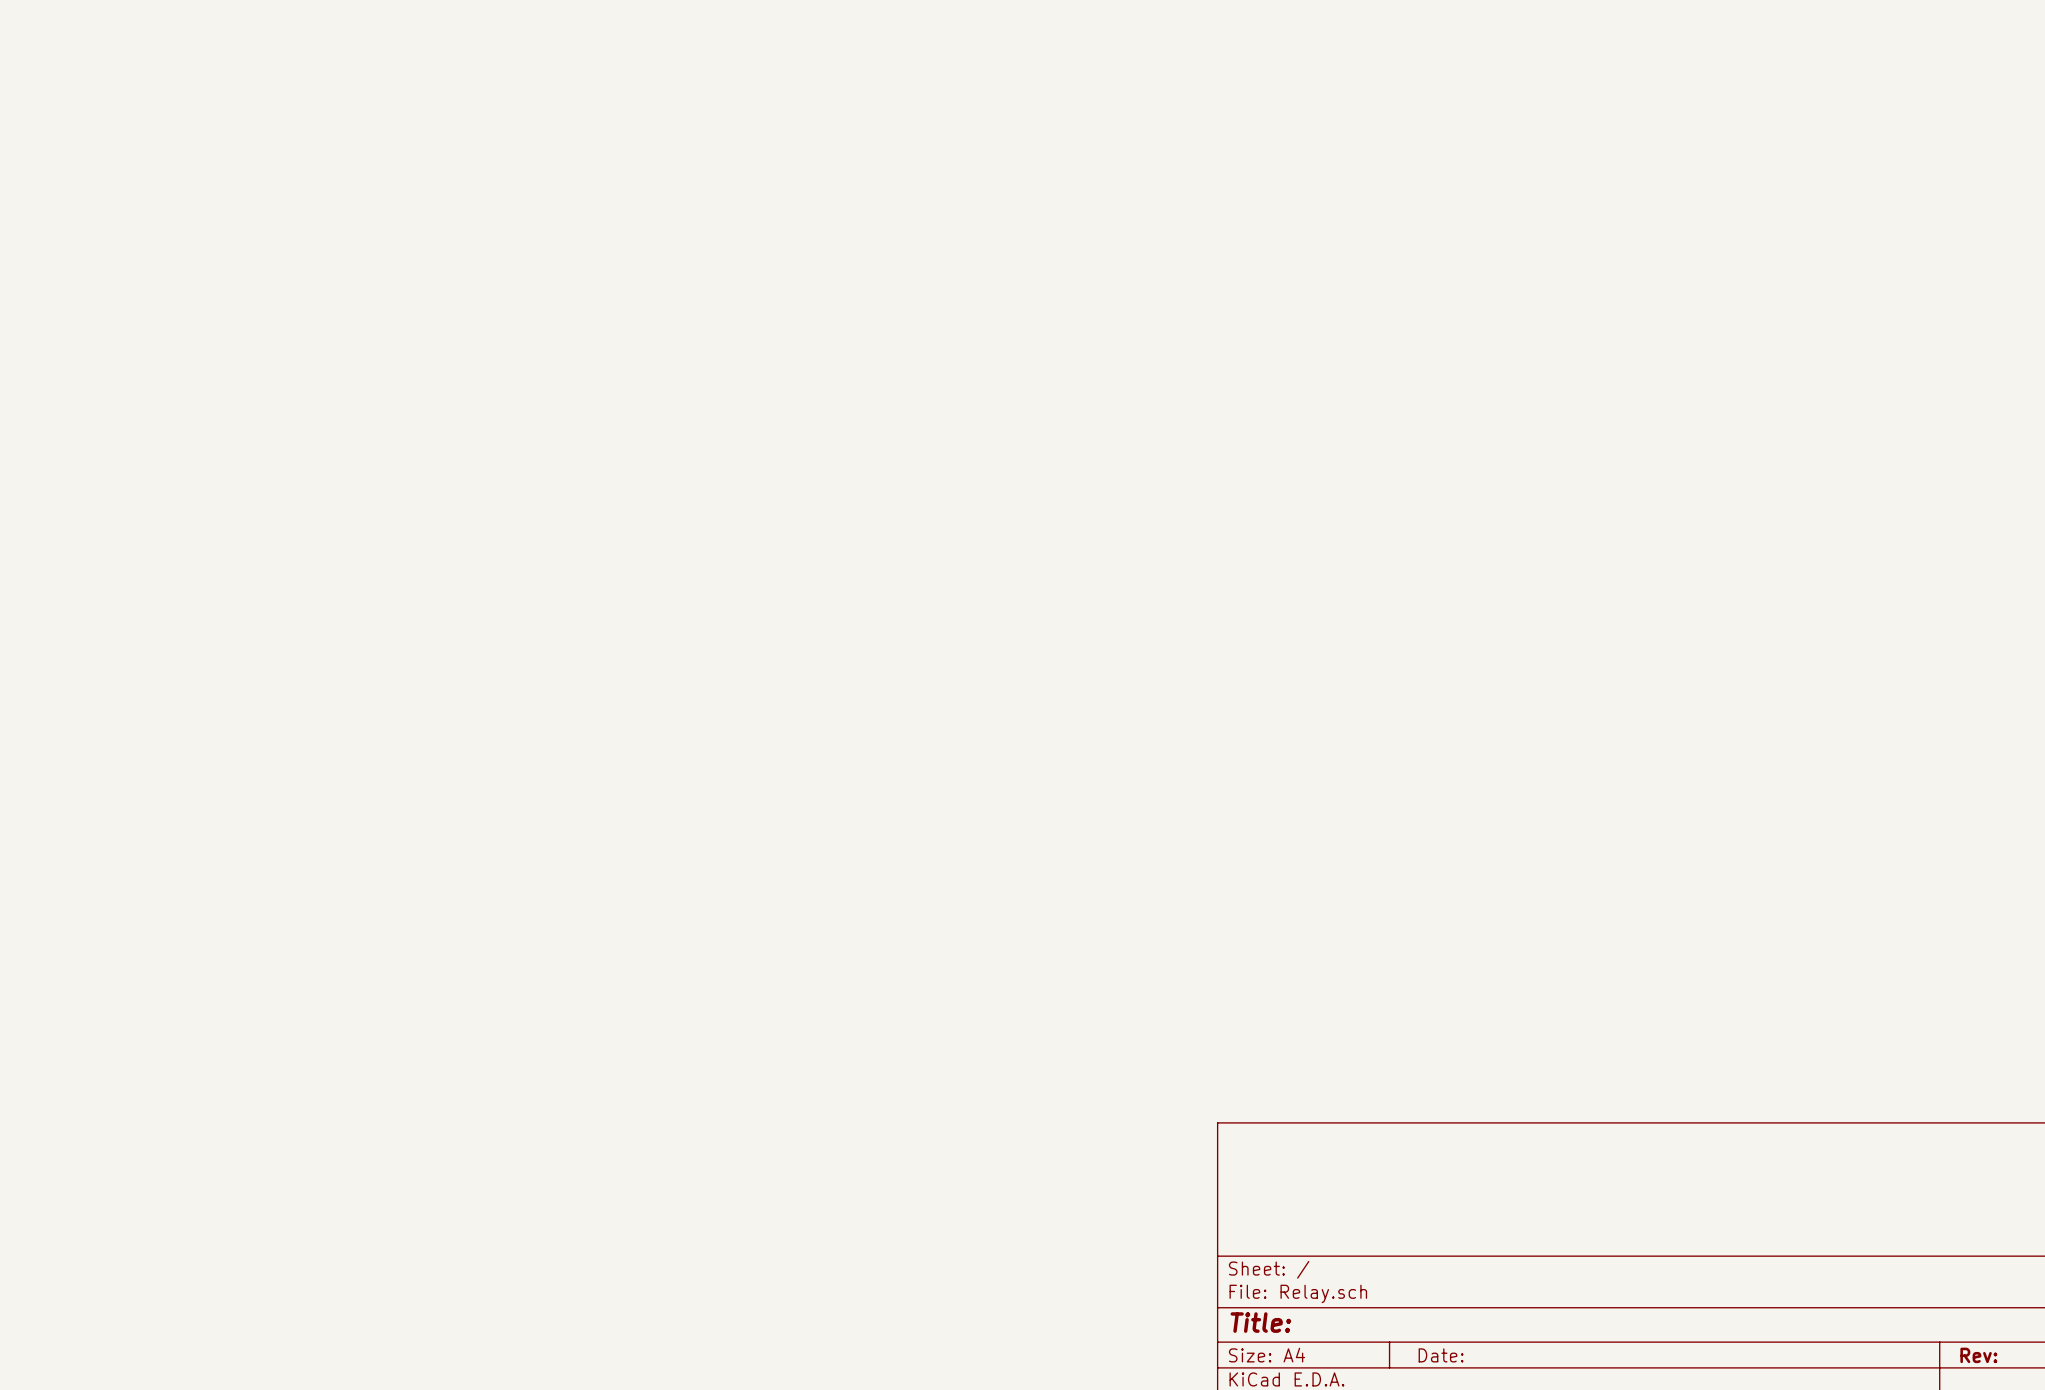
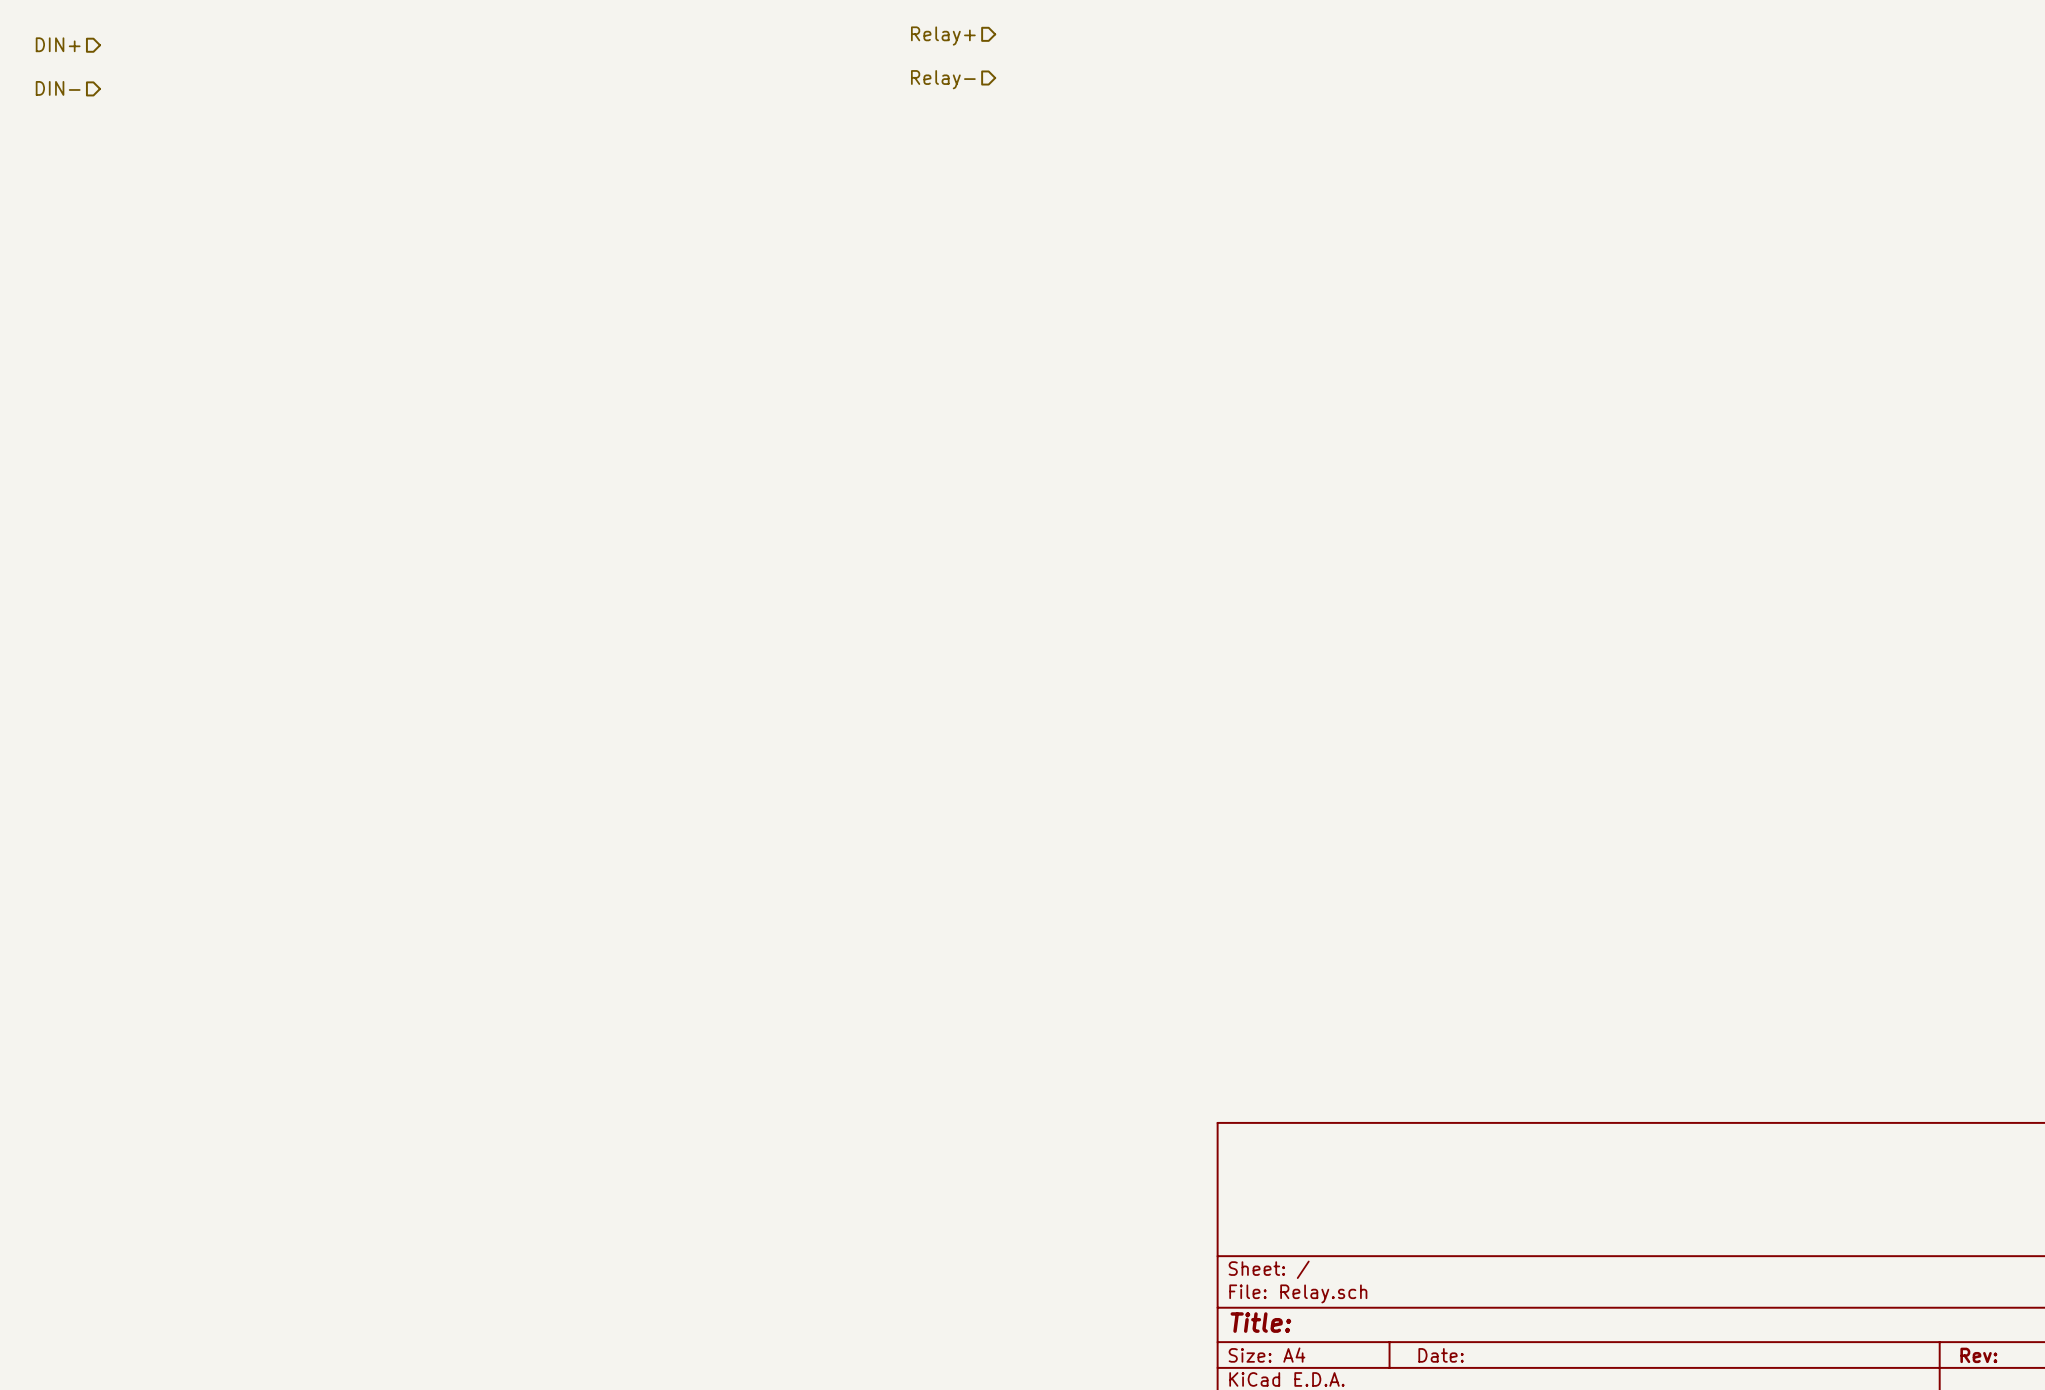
hierarchical label: none -> Relay+ (943, 36)
hierarchical label: none -> DIN+ (58, 44)
hierarchical label: none -> Relay- (943, 79)
hierarchical label: none -> DIN- (58, 88)

